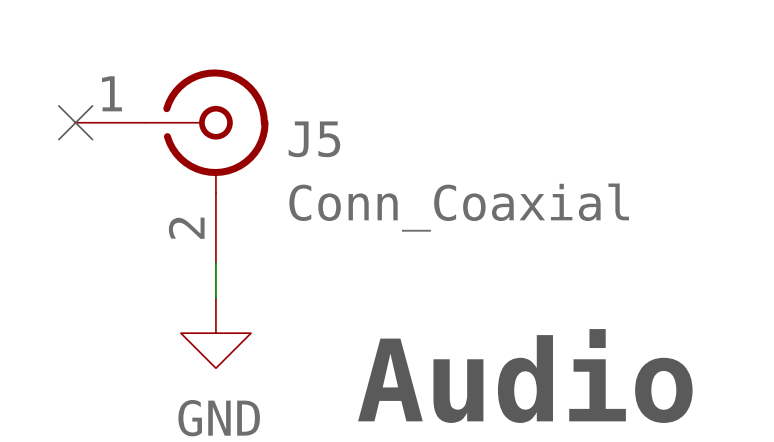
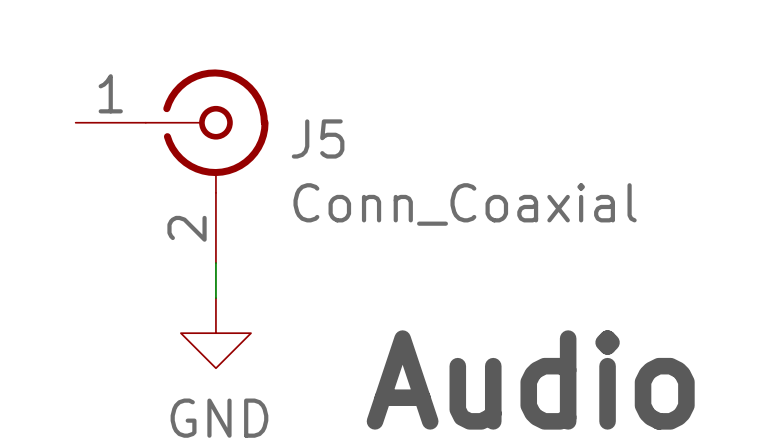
no-connect mark: (75, 122) -> none

